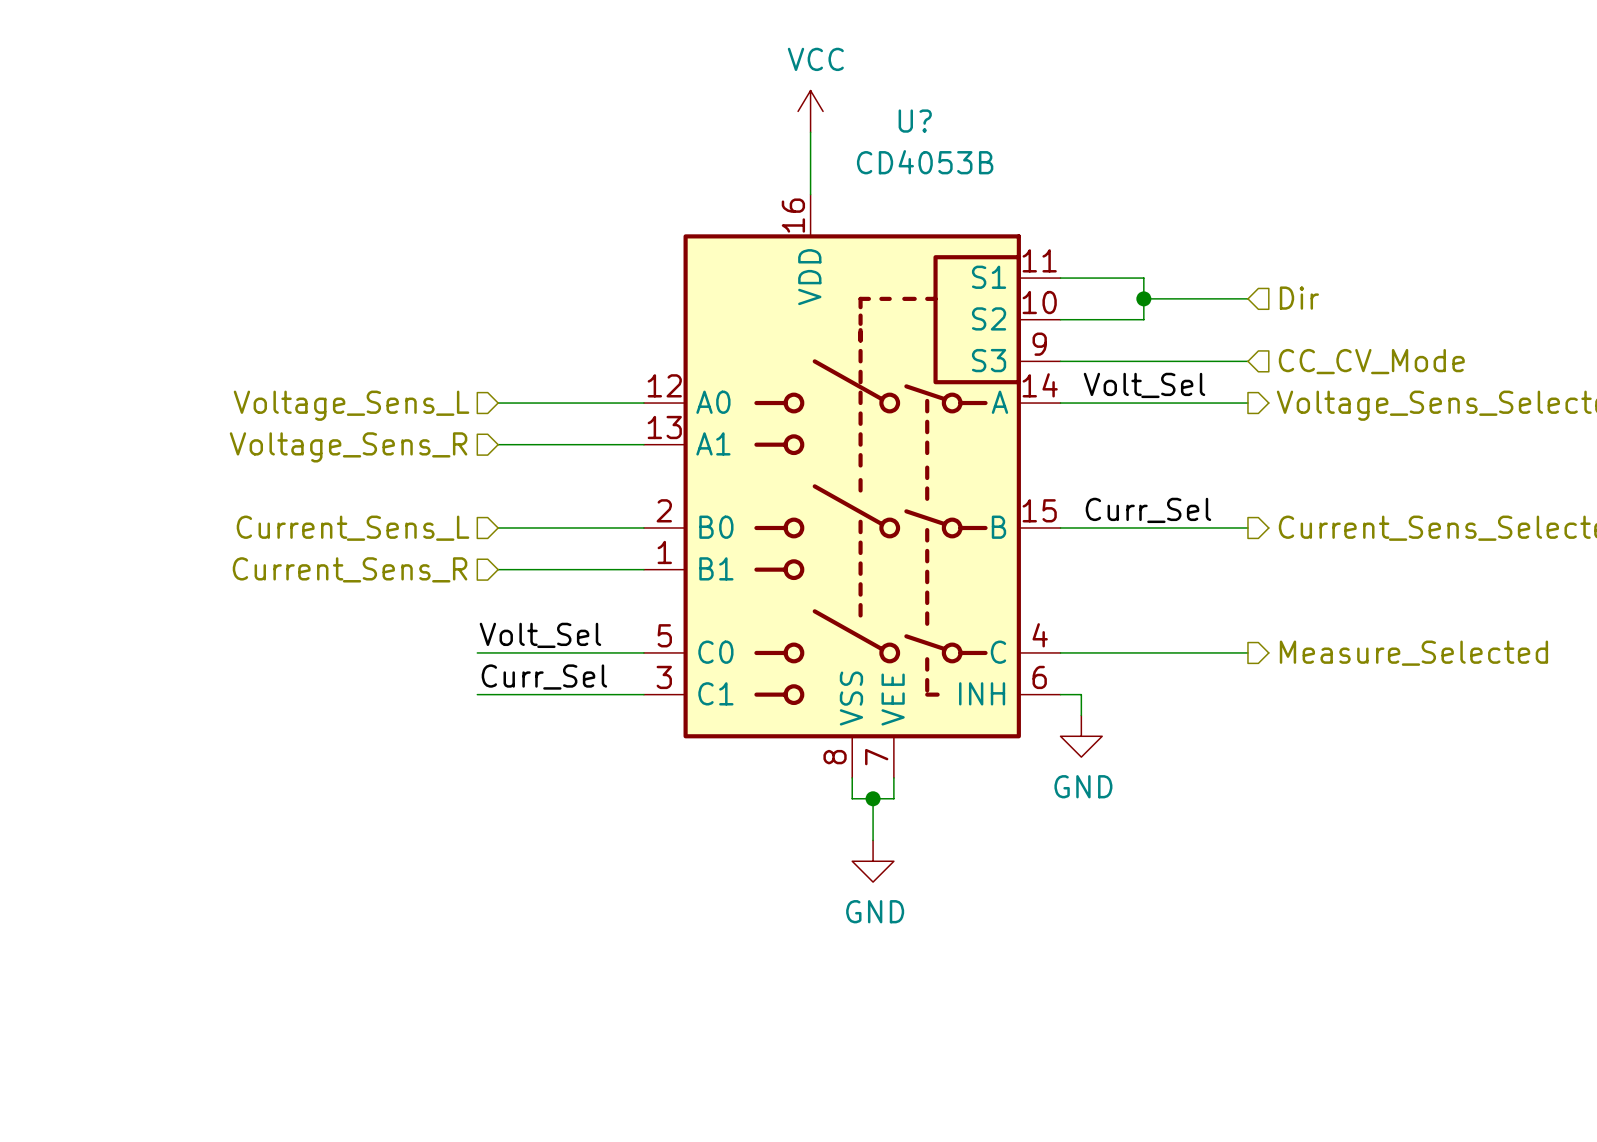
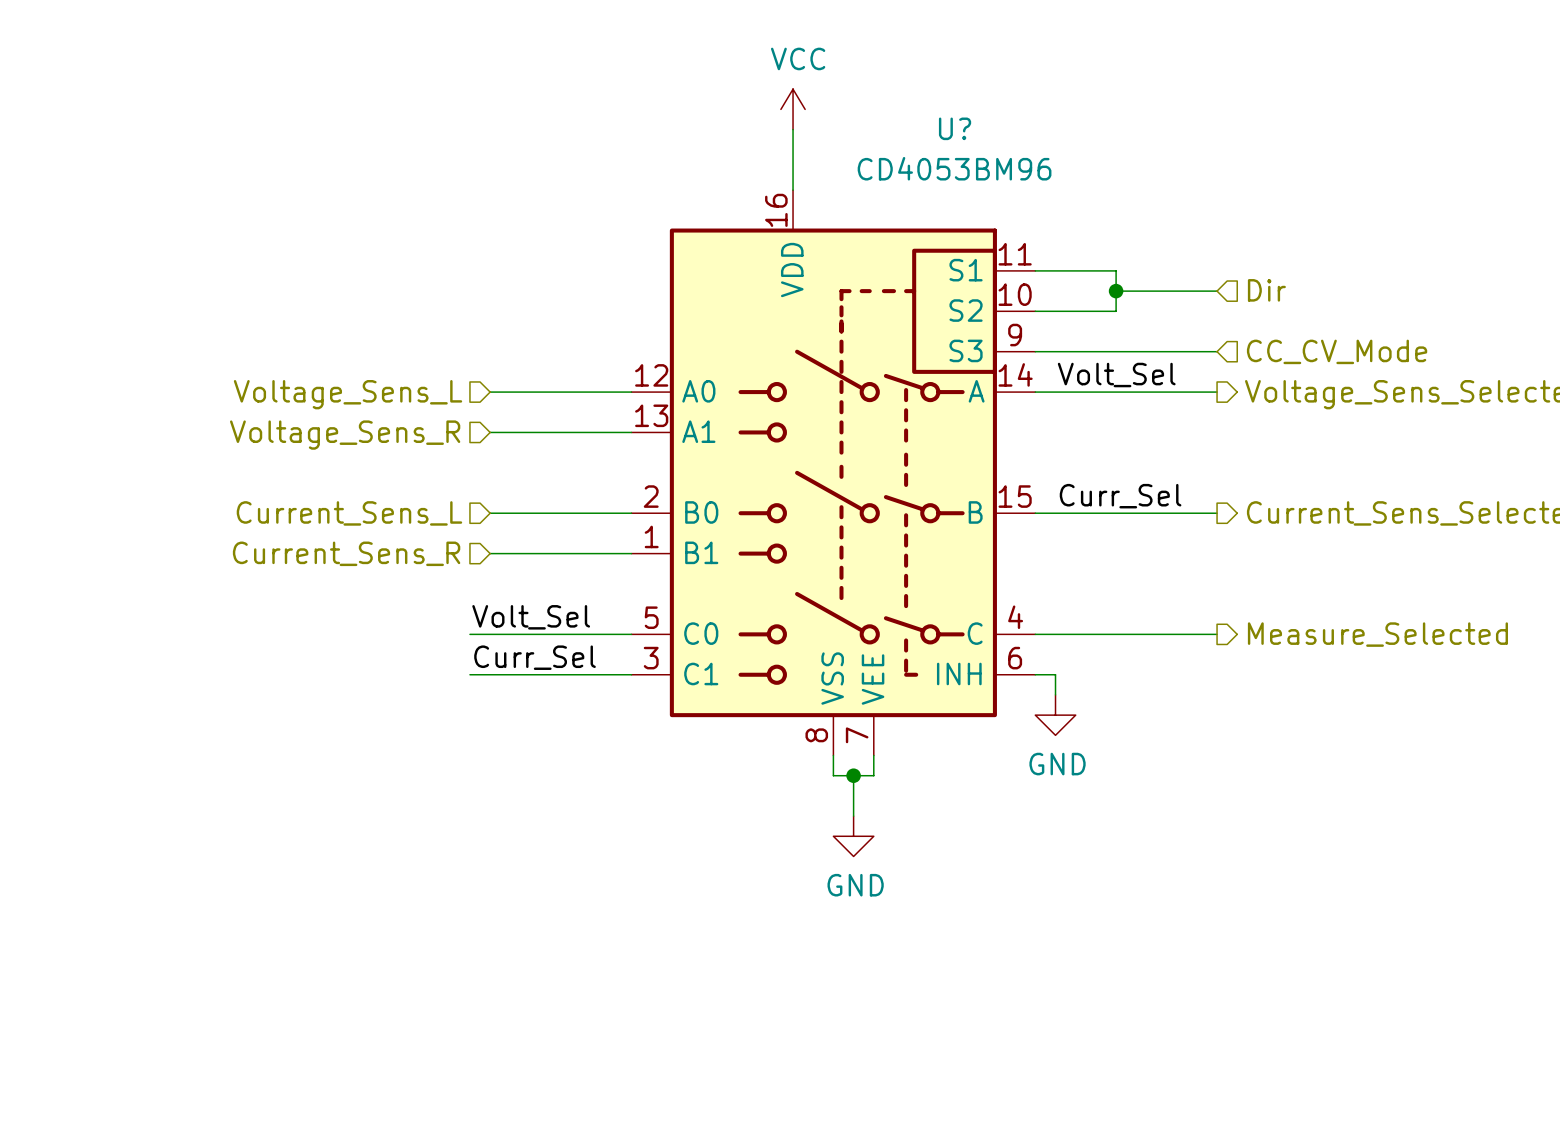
U? name position: U? (915, 121) -> U? (955, 128)
U? value: CD4053B (925, 162) -> CD4053BM96 (954, 168)

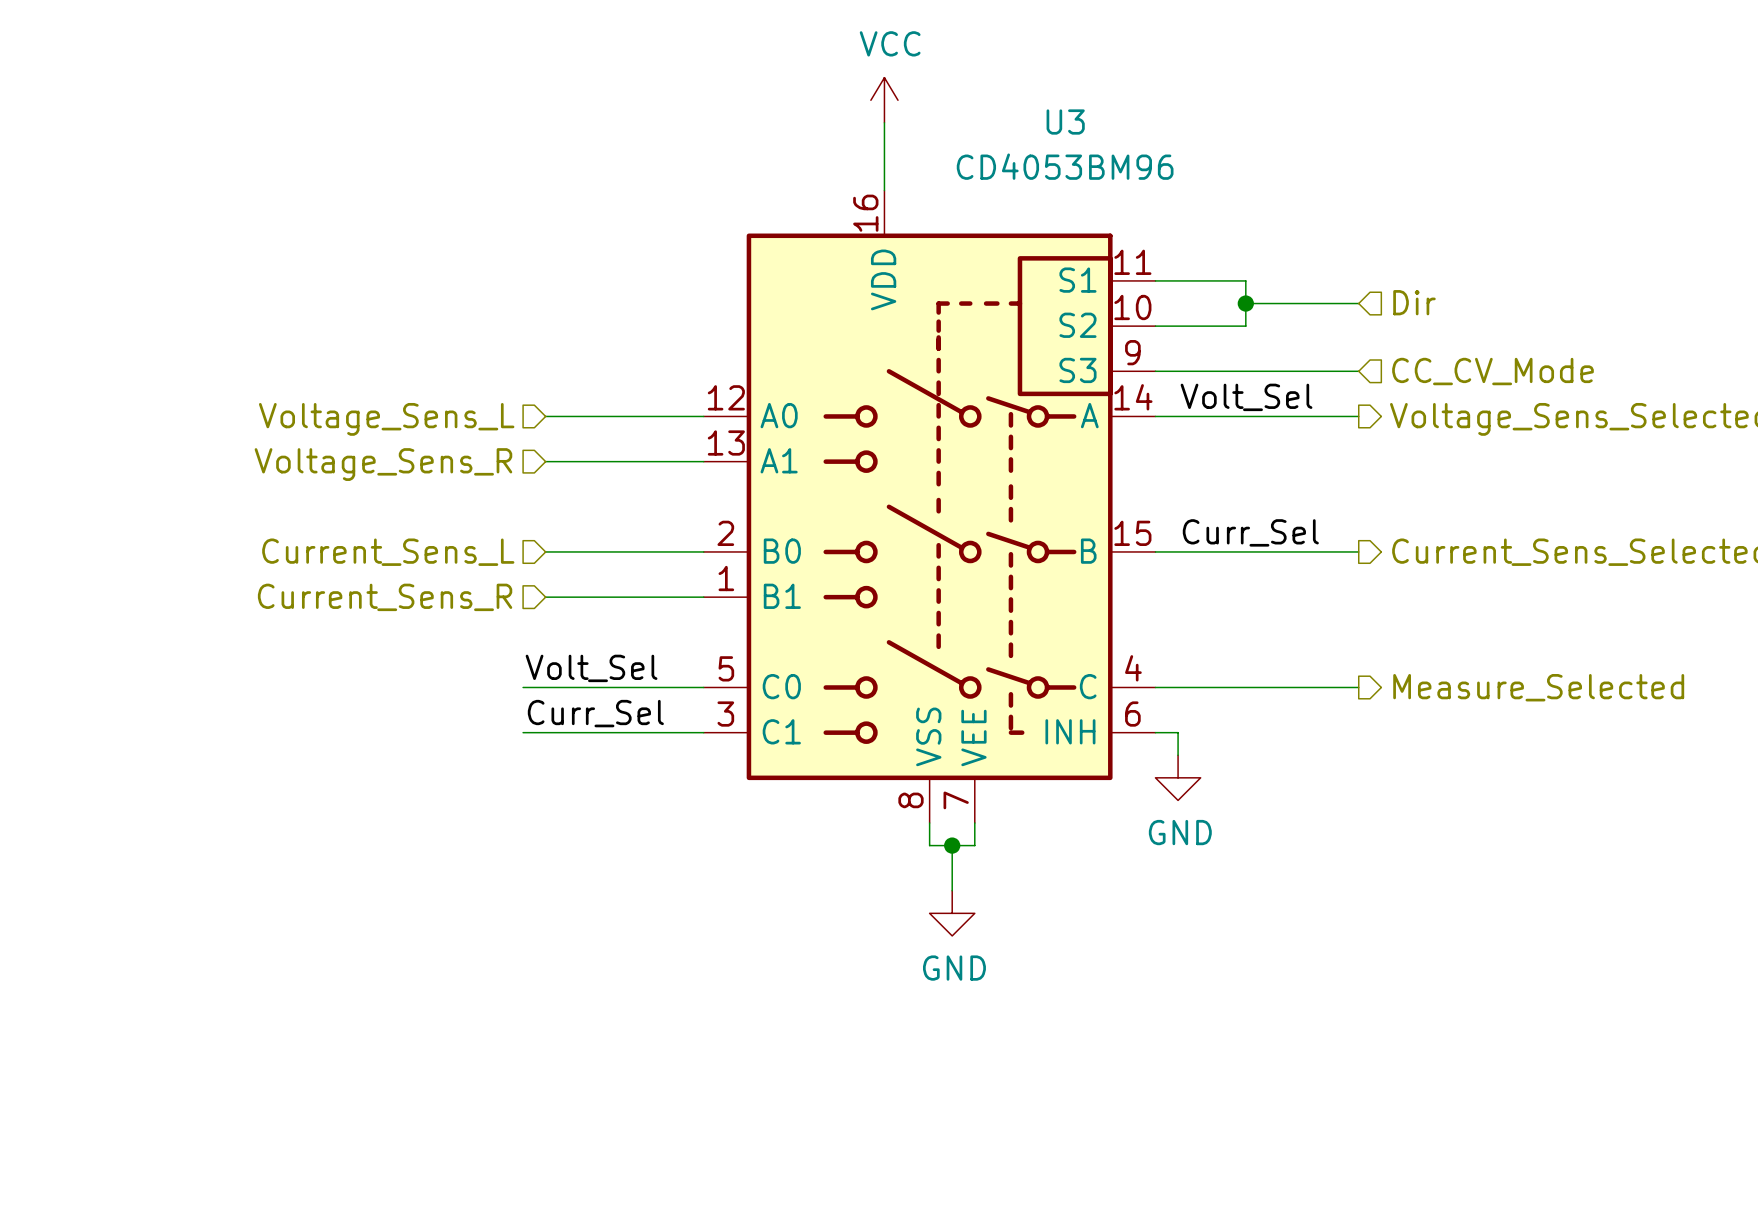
U? name: U? (955, 128) -> U3 (1065, 122)

